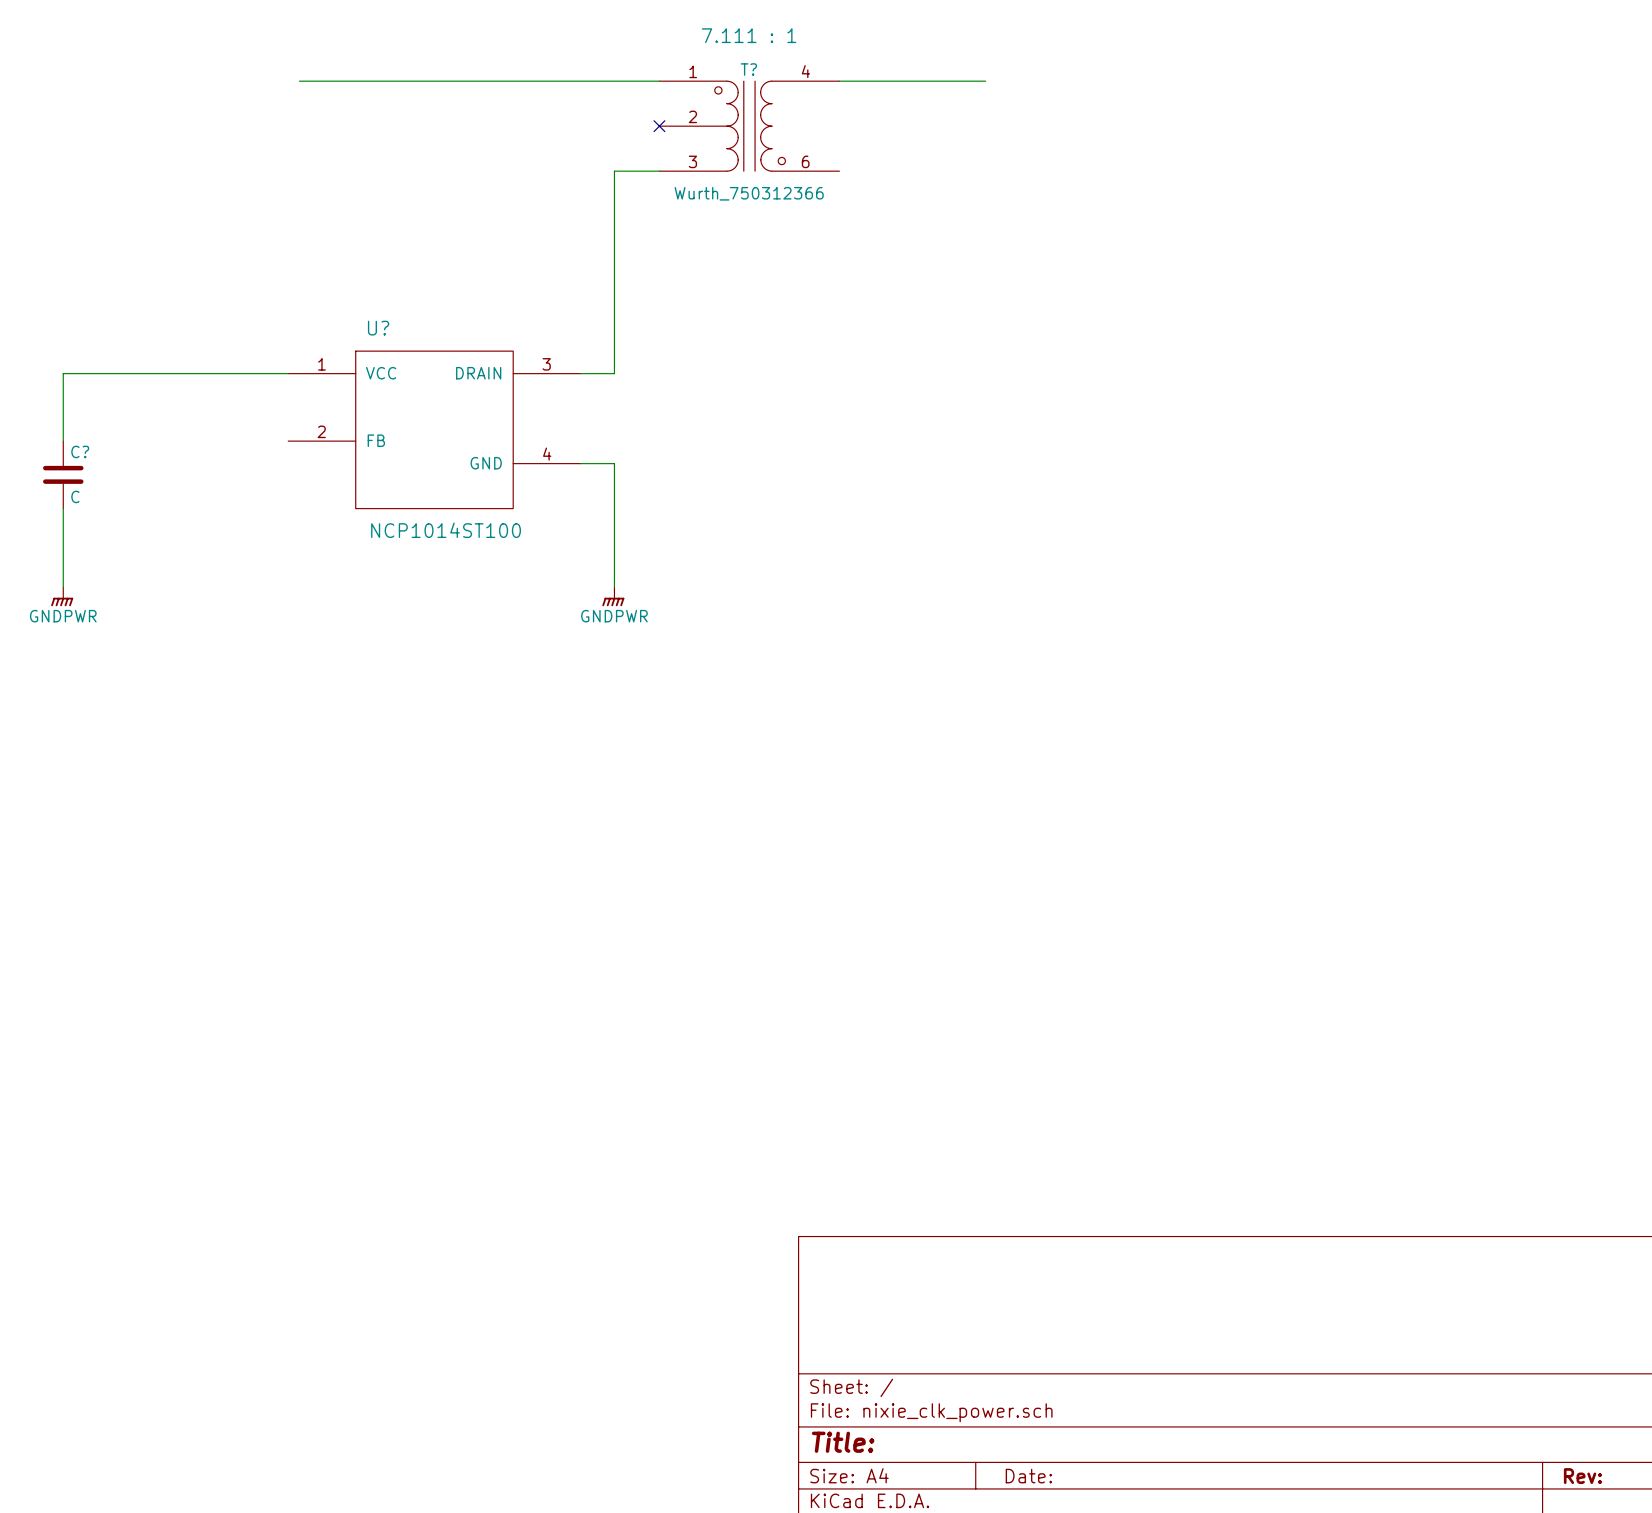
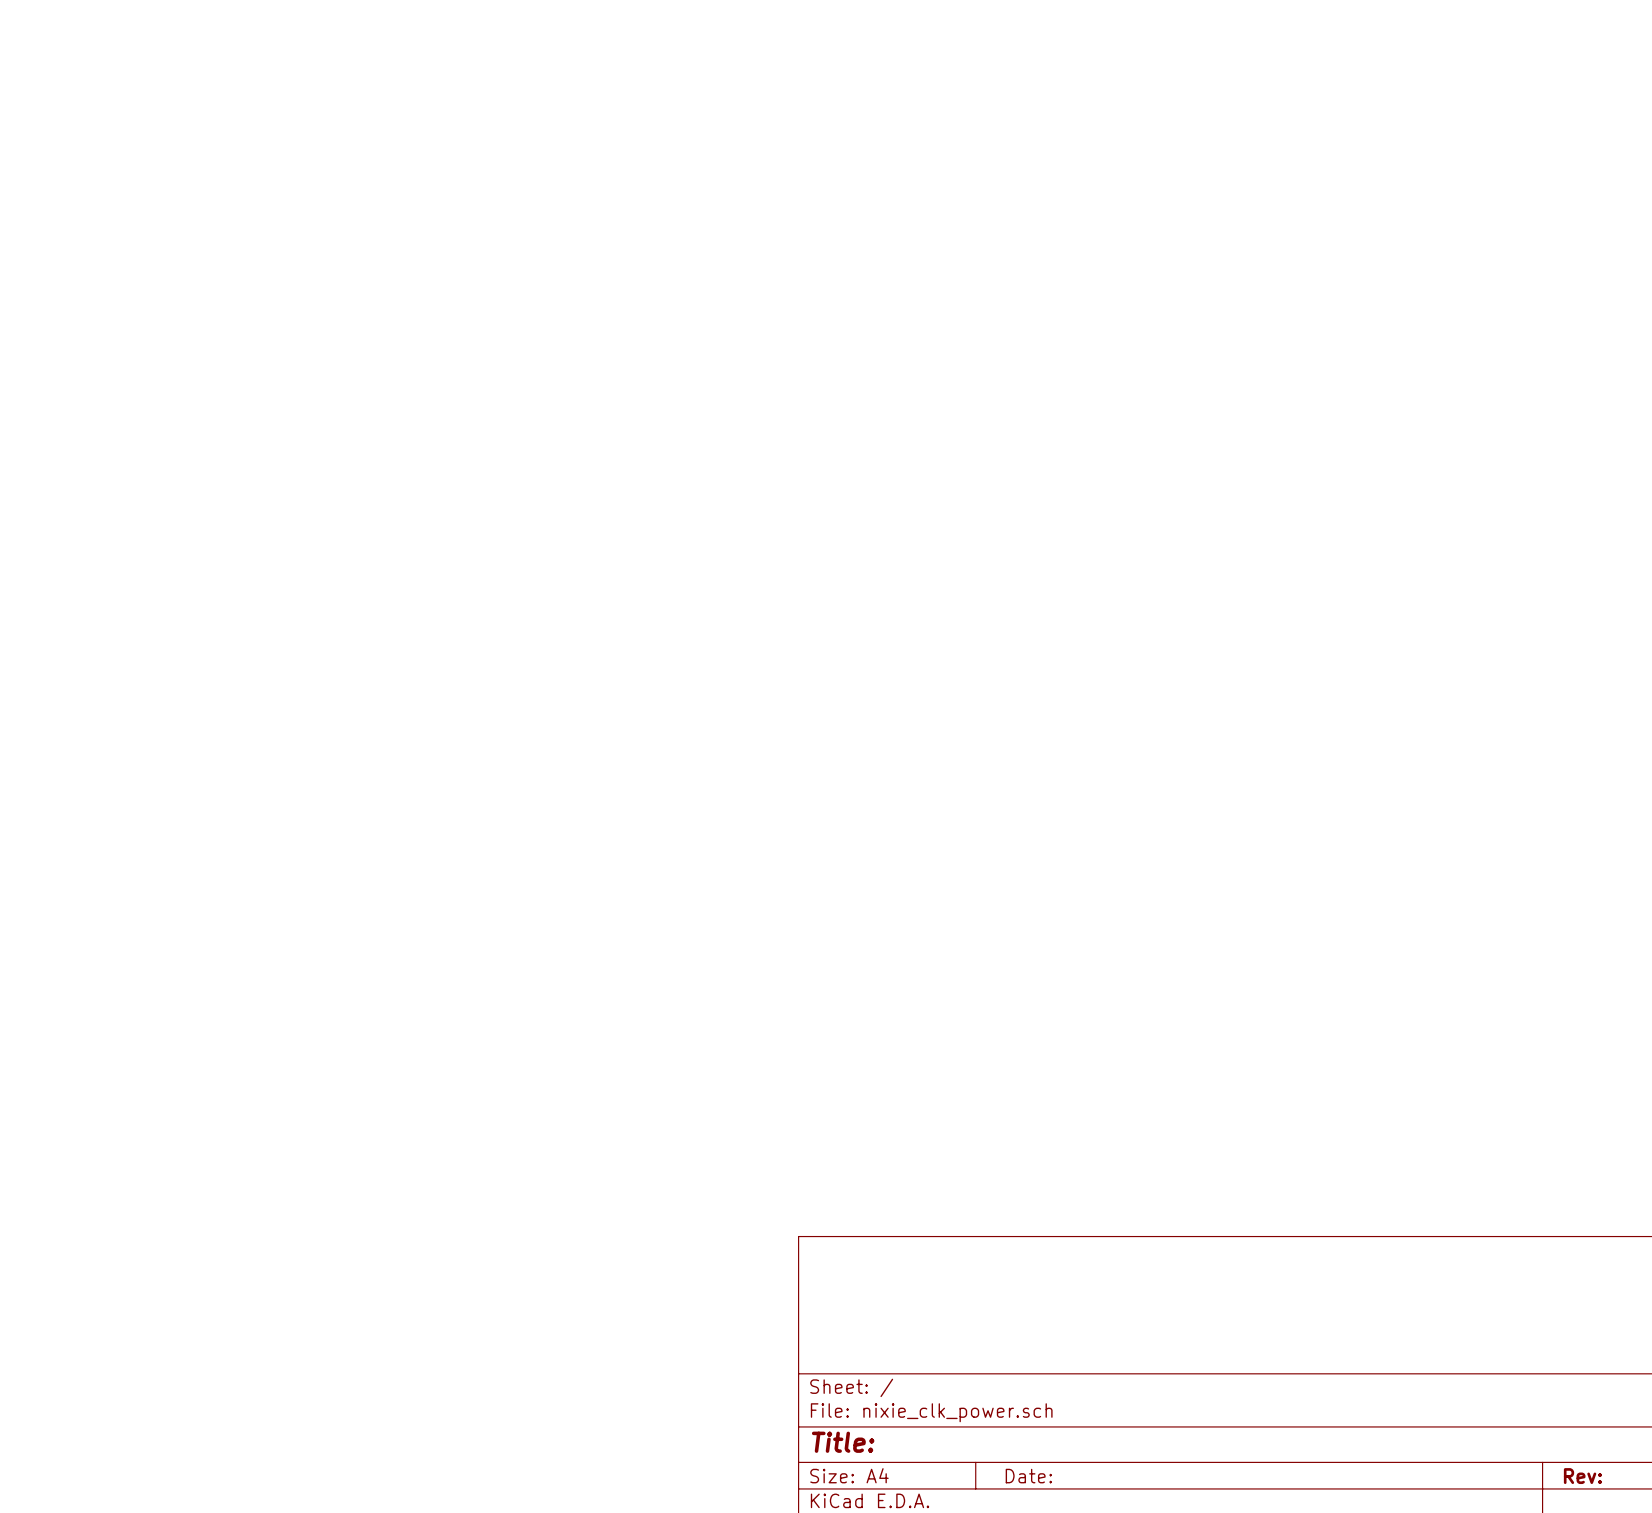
wire: (299, 81) (659, 81) -> none
wire: (839, 81) (985, 81) -> none
no-connect mark: (659, 126) -> none
T?: Wurth_750312366 (749, 126) -> none
wire: (659, 171) (614, 171) (614, 373) (580, 373) -> none
wire: (288, 373) (63, 373) (63, 441) -> none
U?: NCP1014ST100 (434, 429) -> none
wire: (580, 463) (614, 463) (614, 587) -> none
C?: C (63, 474) -> none
wire: (63, 508) (63, 587) -> none
power symbol: GNDPWR (62, 596) -> none
power symbol: GNDPWR (613, 596) -> none

